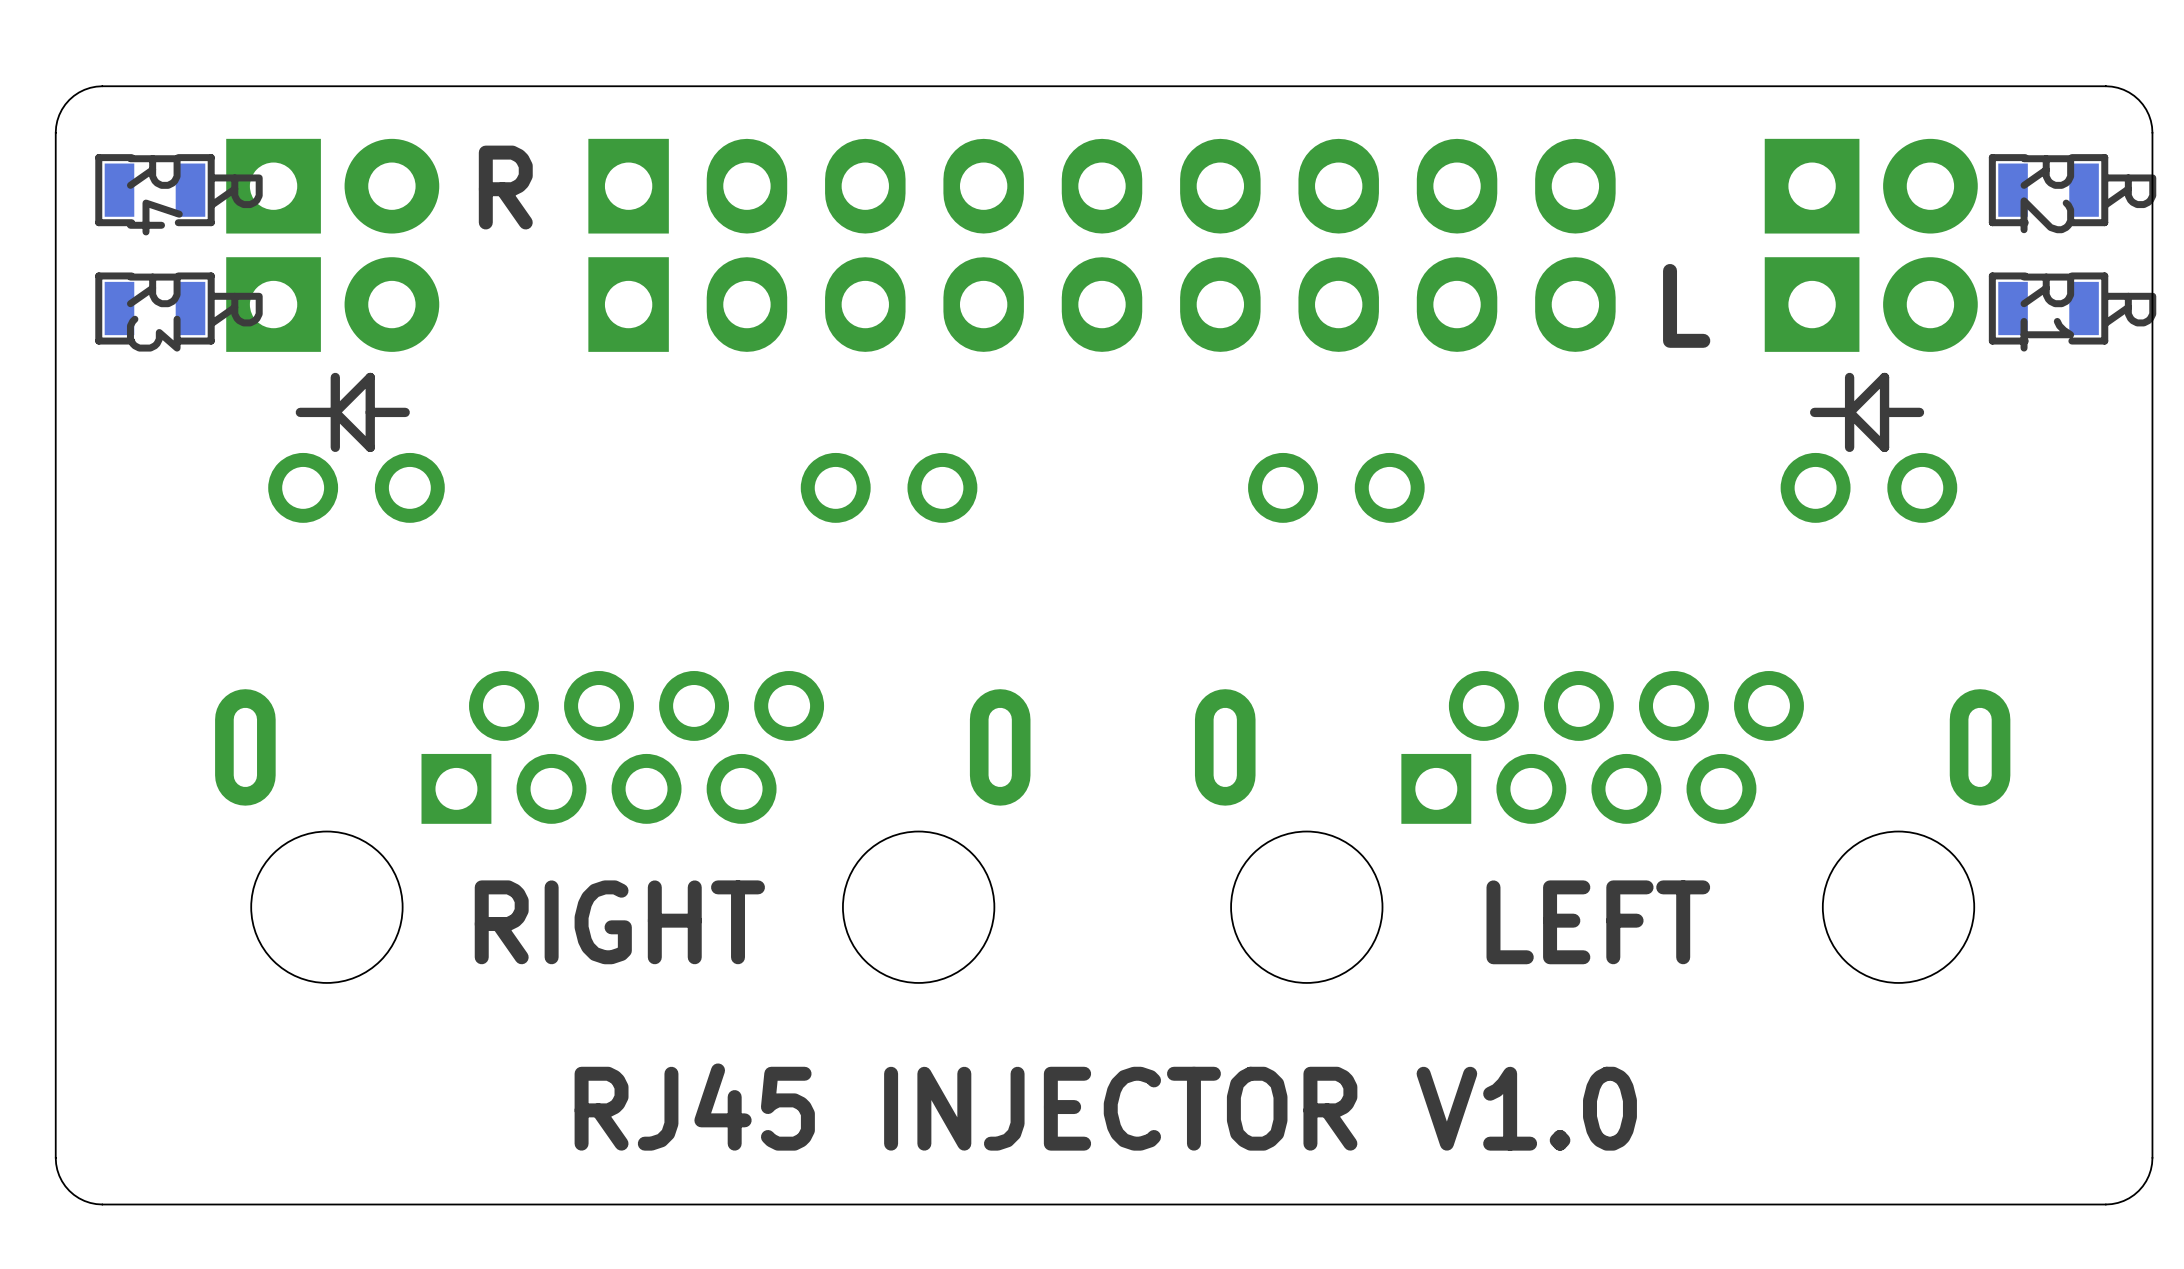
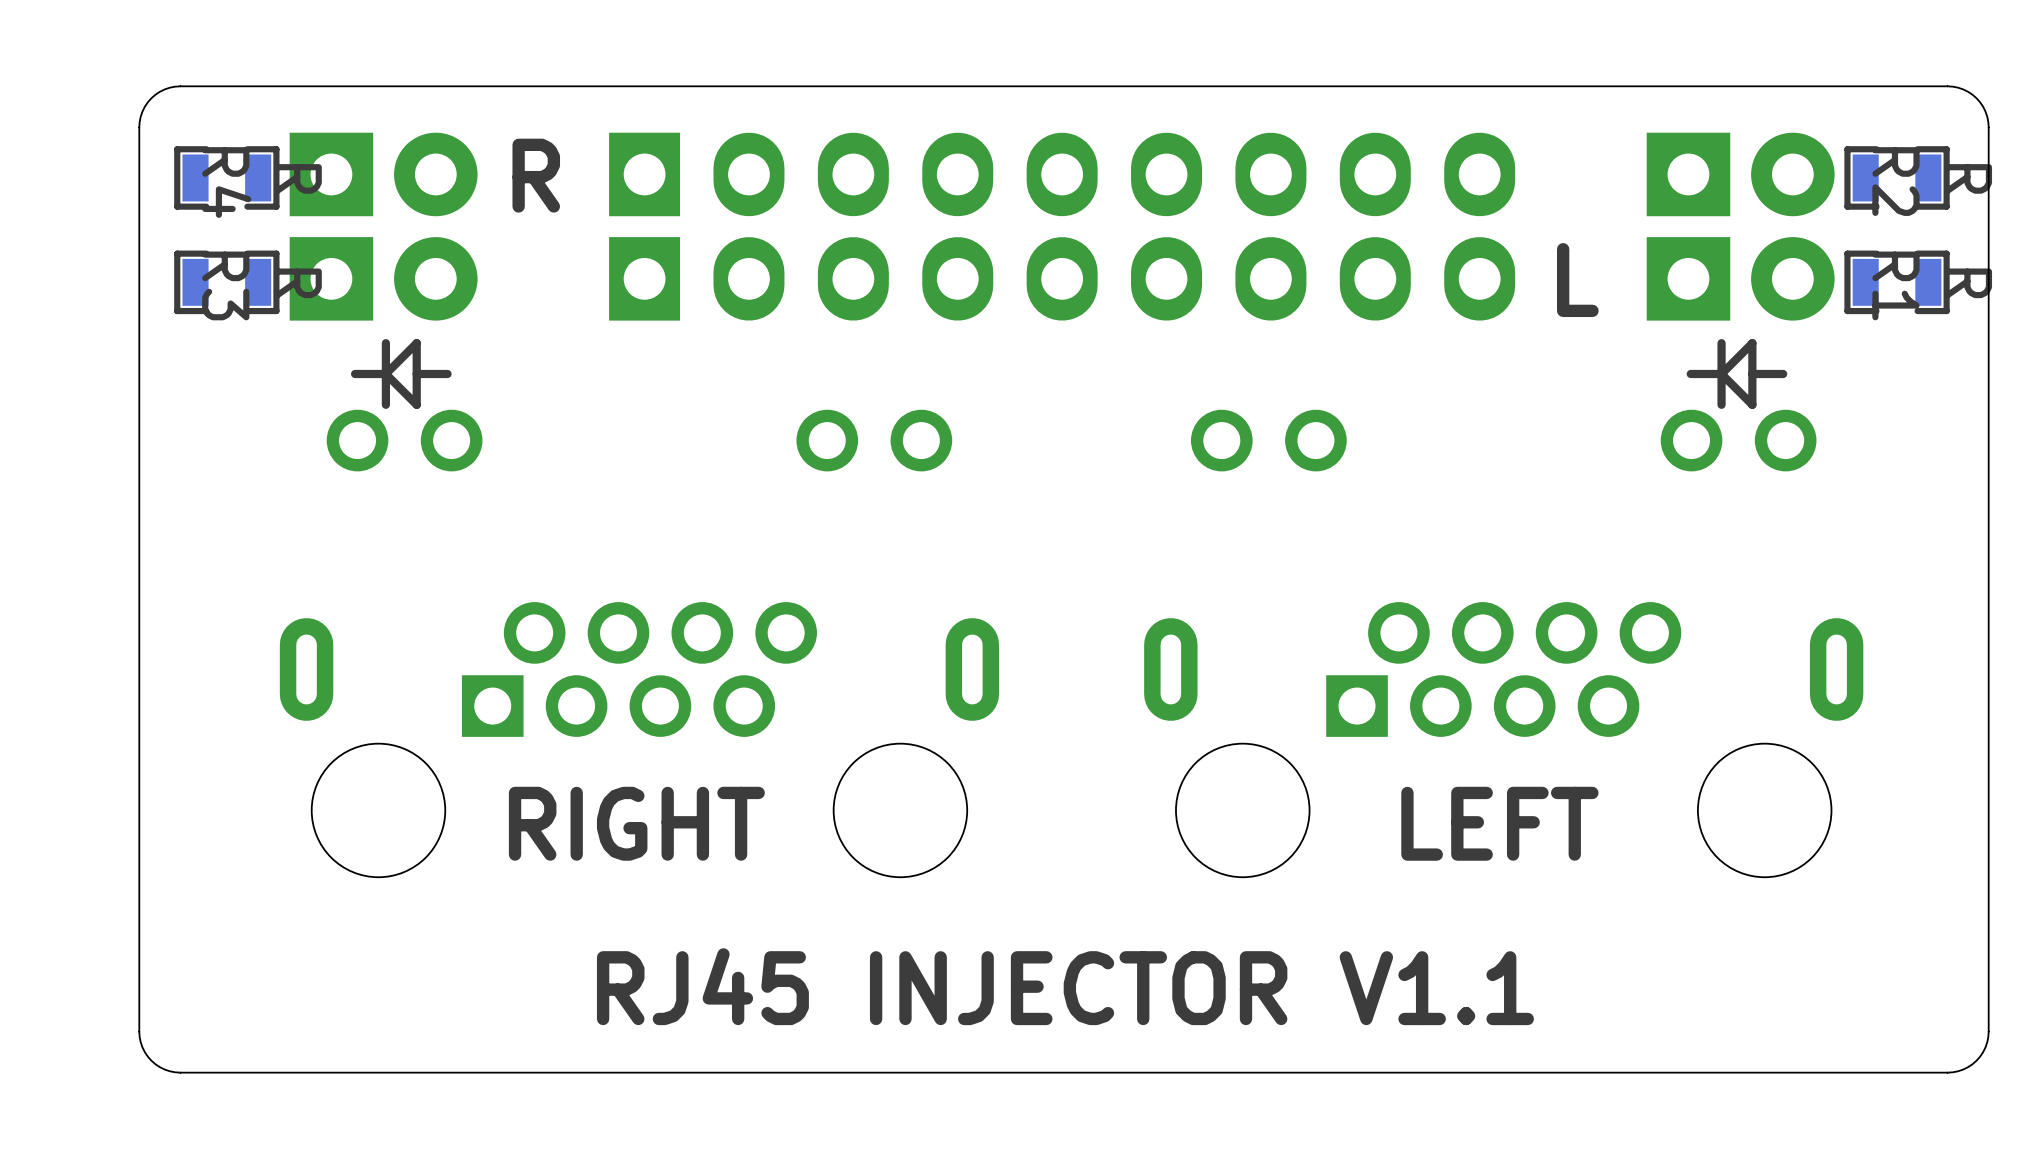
text: RJ45 INJECTOR V1.0 (1105, 1107) -> RJ45 INJECTOR V1.1 (1065, 986)

